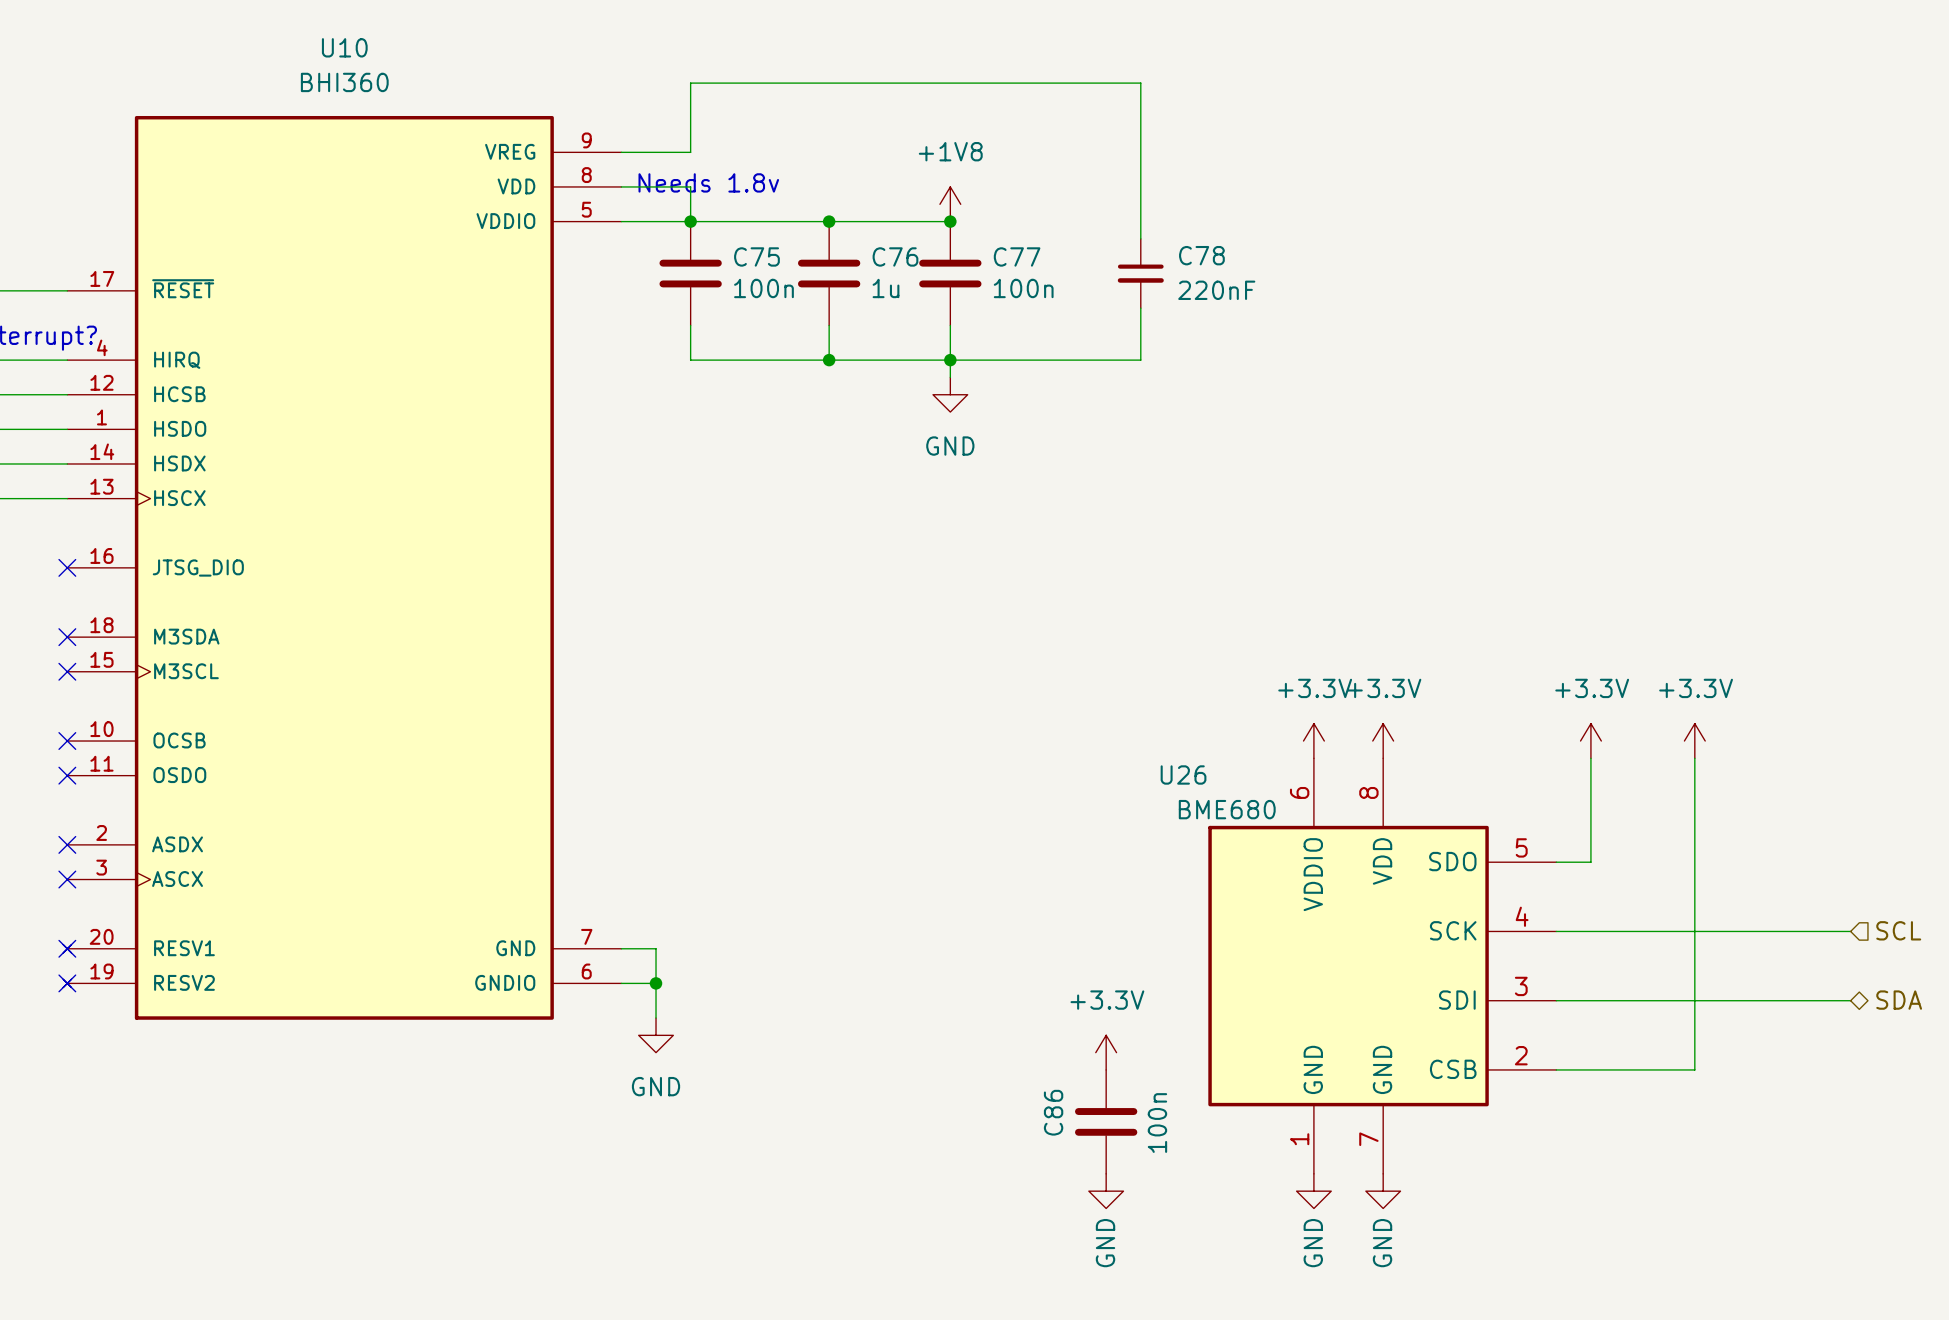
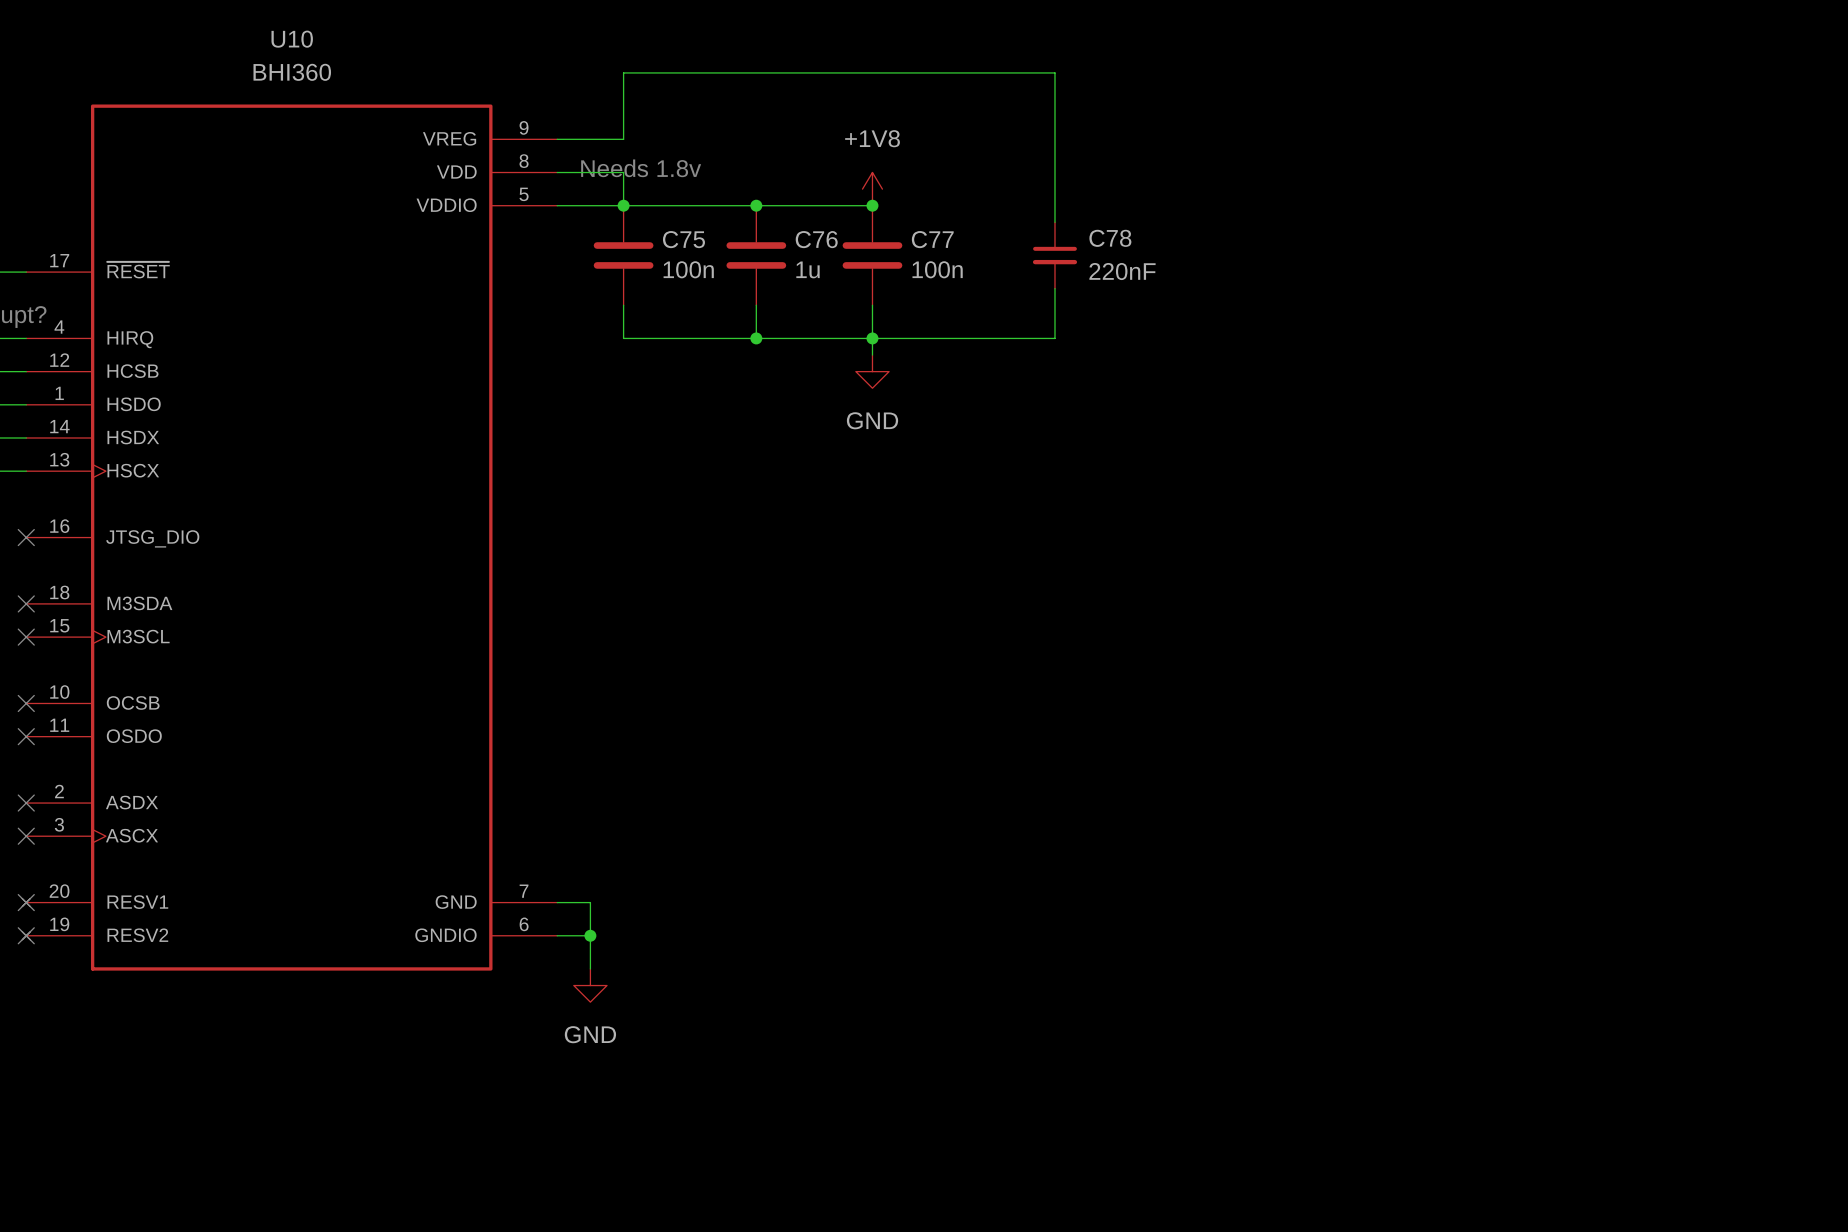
power symbol: +3.3V (1313, 741) -> none
power symbol: +3.3V (1383, 741) -> none
power symbol: +3.3V (1590, 741) -> none
power symbol: +3.3V (1694, 741) -> none
wire: (1590, 758) (1590, 862) (1556, 862) -> none
wire: (1694, 758) (1694, 1069) (1556, 1069) -> none
hierarchical label: SCL (1898, 930) -> none
wire: (1556, 931) (1850, 931) -> none
U26: BME680 (1382, 966) -> none
wire: (1556, 1000) (1850, 1000) -> none
hierarchical label: SDA (1899, 1000) -> none
power symbol: +3.3V (1106, 1052) -> none
C86: 100n (1106, 1121) -> none
power symbol: GND (1106, 1191) -> none
power symbol: GND (1313, 1191) -> none
power symbol: GND (1383, 1191) -> none

